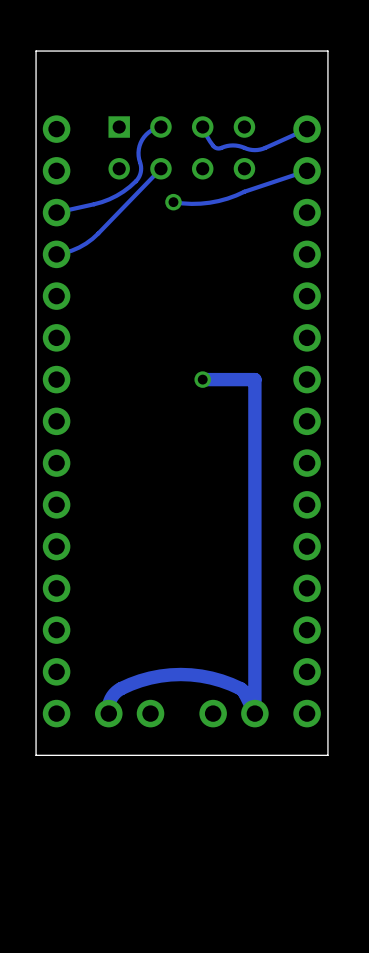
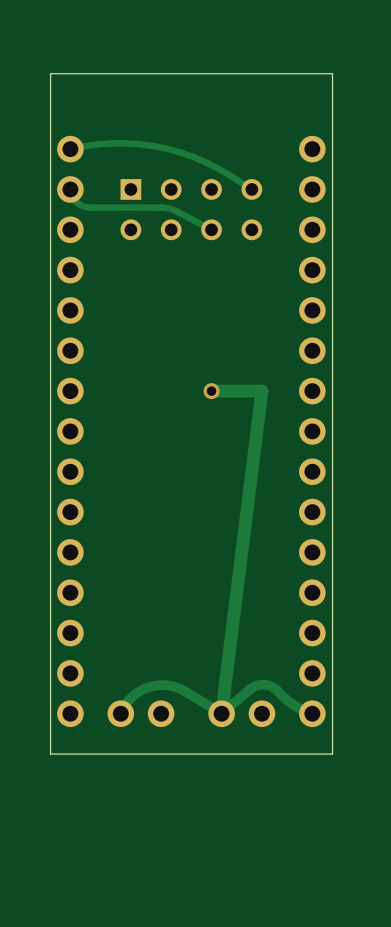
track: (160, 127) (148, 132) (142, 139) (138, 152) (140, 172) (137, 179) (129, 186) (116, 195) (101, 202) (56, 212) -> none
track: (202, 127) (215, 147) (235, 145) (254, 150) (265, 147) (307, 129) -> none
track: none -> (70, 149) (111, 143) (139, 144) (166, 148) (205, 162) (251, 189)
part position: (181, 147) -> (191, 209)
track: (160, 168) (92, 238) (71, 250) (56, 254) -> none
track: none -> (70, 189) (75, 200) (85, 207) (165, 207) (177, 211) (211, 229)
track: (307, 170) (218, 201) (191, 203) (173, 202) -> none
via: (173, 202) -> none
track: (254, 379) (254, 713) (243, 691) (240, 688) (211, 678) (180, 674) (150, 678) (121, 688) (110, 698) (108, 713) -> (261, 391) (221, 713)
track: none -> (221, 713) (180, 688) (164, 685) (147, 687) (137, 692) (129, 699) (120, 713)
track: none -> (312, 713) (293, 705) (271, 686) (261, 684) (251, 687) (221, 713)

